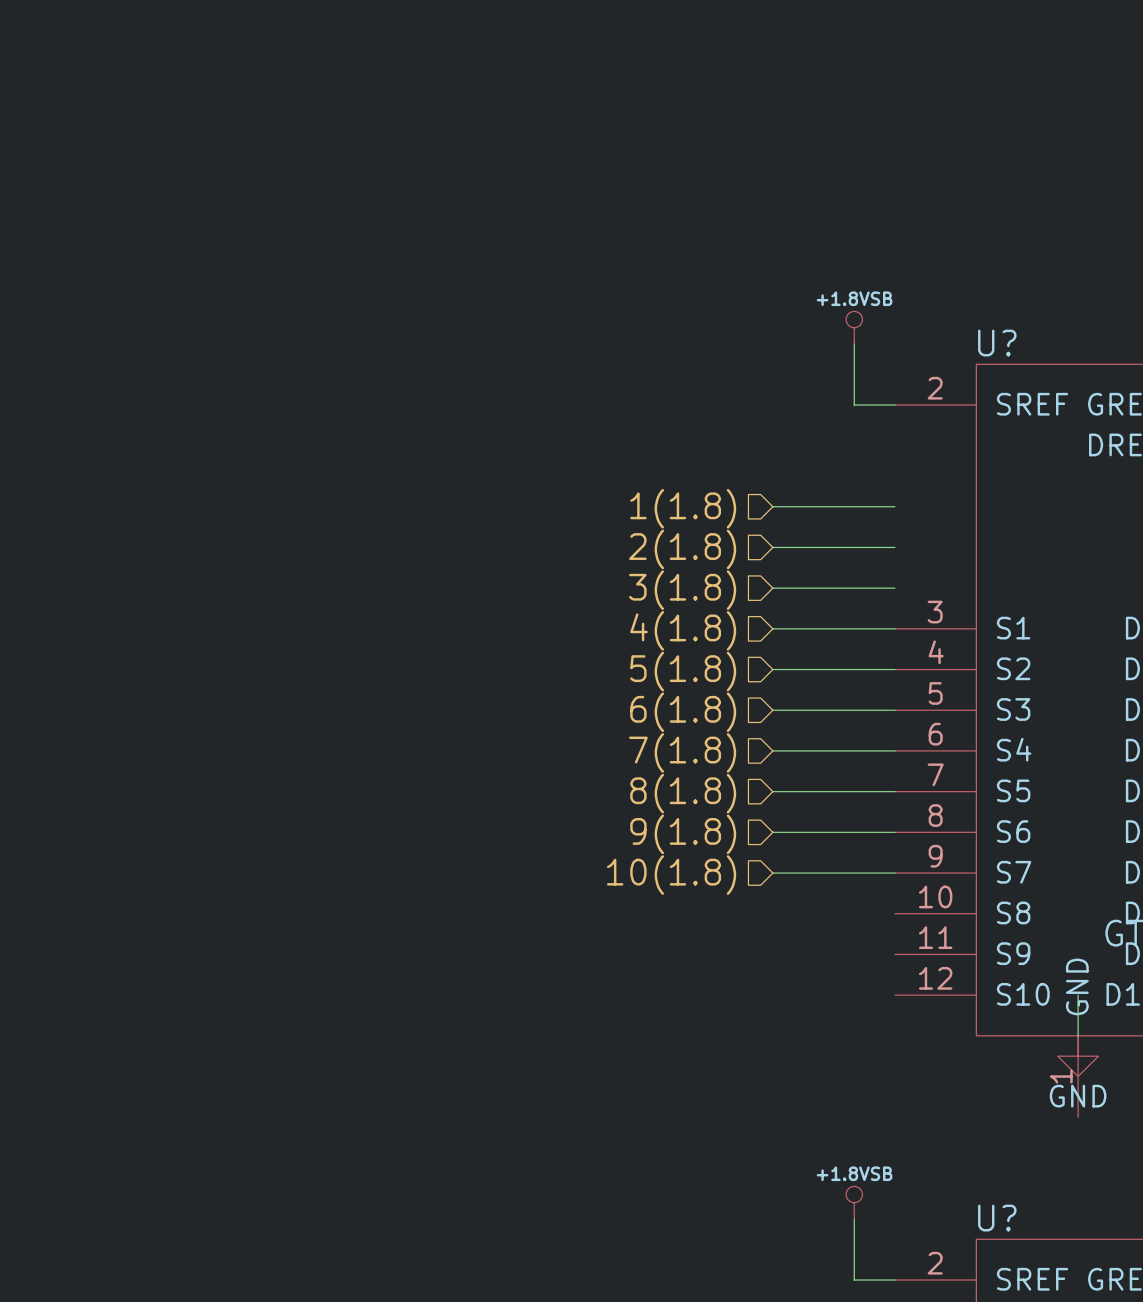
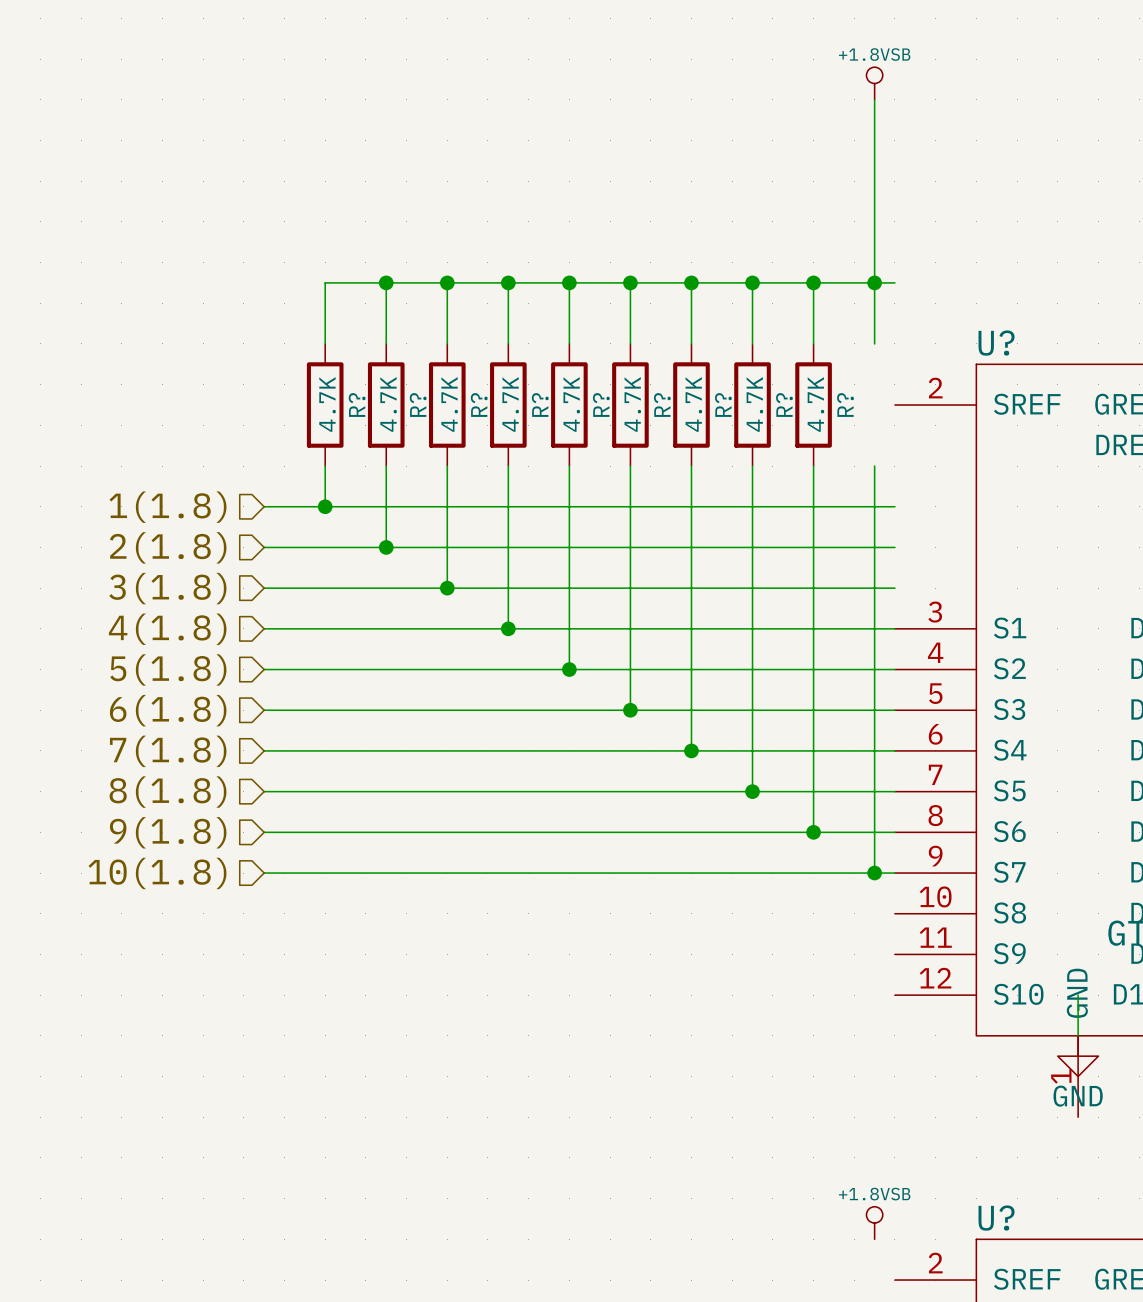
wire: none -> (874, 99) (874, 343)
wire: none -> (386, 282) (386, 343)
junction: none -> (386, 282)
wire: none -> (447, 282) (447, 343)
junction: none -> (447, 282)
wire: none -> (508, 282) (508, 343)
junction: none -> (508, 282)
wire: none -> (569, 282) (569, 343)
junction: none -> (569, 282)
wire: none -> (630, 282) (630, 343)
junction: none -> (630, 282)
wire: none -> (691, 282) (691, 343)
junction: none -> (691, 282)
wire: none -> (752, 282) (752, 343)
junction: none -> (752, 282)
wire: none -> (813, 282) (813, 343)
junction: none -> (813, 282)
junction: none -> (874, 282)
wire: none -> (894, 282) (325, 282) (325, 343)
power symbol position: +1.8VSB (854, 327) -> +1.8VSB (874, 83)
wire: (854, 343) (854, 405) (894, 405) -> none
R?: none -> 4.7K (325, 405)
R?: none -> 4.7K (386, 405)
R?: none -> 4.7K (447, 405)
R?: none -> 4.7K (508, 405)
R?: none -> 4.7K (569, 405)
R?: none -> 4.7K (630, 405)
R?: none -> 4.7K (691, 405)
R?: none -> 4.7K (752, 405)
R?: none -> 4.7K (813, 405)
wire: none -> (325, 466) (325, 506)
wire: none -> (386, 466) (386, 547)
wire: none -> (447, 466) (447, 588)
wire: none -> (508, 466) (508, 628)
wire: none -> (569, 466) (569, 669)
wire: none -> (630, 466) (630, 710)
wire: none -> (691, 466) (691, 750)
wire: none -> (752, 466) (752, 791)
wire: none -> (813, 466) (813, 832)
wire: none -> (874, 466) (874, 873)
wire: none -> (264, 506) (772, 506)
junction: none -> (325, 506)
hierarchical label: none -> 1(1.8) (167, 507)
hierarchical label: 1(1.8) (683, 508) -> none
wire: none -> (264, 547) (772, 547)
junction: none -> (386, 547)
hierarchical label: none -> 2(1.8) (168, 547)
hierarchical label: 2(1.8) (682, 549) -> none
wire: none -> (264, 588) (772, 588)
junction: none -> (447, 588)
hierarchical label: none -> 3(1.8) (167, 588)
hierarchical label: 3(1.8) (682, 590) -> none
wire: none -> (264, 628) (772, 628)
junction: none -> (508, 628)
hierarchical label: none -> 4(1.8) (167, 629)
hierarchical label: 4(1.8) (683, 630) -> none
wire: none -> (264, 669) (772, 669)
junction: none -> (569, 669)
hierarchical label: none -> 5(1.8) (168, 669)
hierarchical label: 5(1.8) (683, 671) -> none
wire: none -> (264, 710) (772, 710)
junction: none -> (630, 710)
hierarchical label: none -> 6(1.8) (168, 710)
hierarchical label: 6(1.8) (683, 712) -> none
wire: none -> (264, 750) (772, 750)
junction: none -> (691, 750)
hierarchical label: none -> 7(1.8) (168, 751)
hierarchical label: 7(1.8) (682, 752) -> none
wire: none -> (264, 791) (772, 791)
junction: none -> (752, 791)
hierarchical label: none -> 8(1.8) (168, 792)
hierarchical label: 8(1.8) (683, 793) -> none
wire: none -> (264, 832) (772, 832)
junction: none -> (813, 832)
hierarchical label: none -> 9(1.8) (168, 832)
hierarchical label: 9(1.8) (683, 834) -> none
wire: none -> (264, 873) (772, 873)
junction: none -> (874, 873)
hierarchical label: none -> 10(1.8) (157, 873)
hierarchical label: 10(1.8) (671, 875) -> none
power symbol position: +1.8VSB (854, 1202) -> +1.8VSB (874, 1223)
wire: (854, 1218) (854, 1280) (894, 1280) -> none

